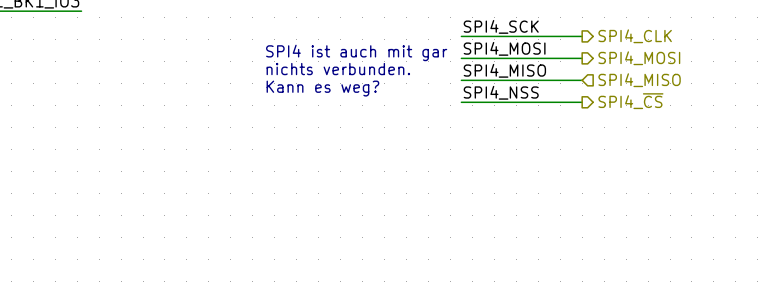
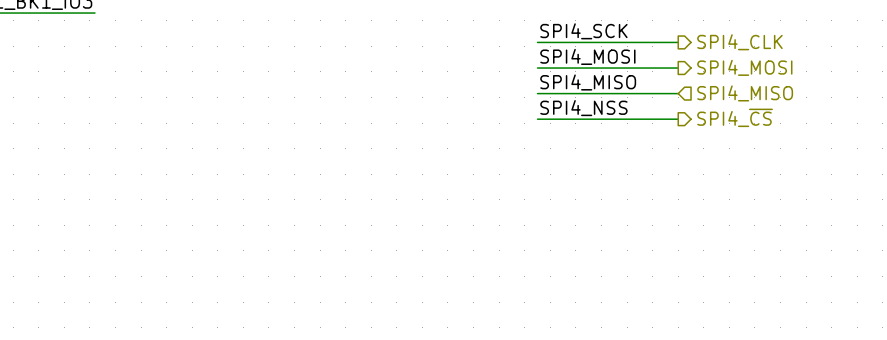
text: SPI4 ist auch mit gar (356, 52) -> none
text: nichts verbunden. (338, 69) -> none
text: Kann es weg? (322, 88) -> none

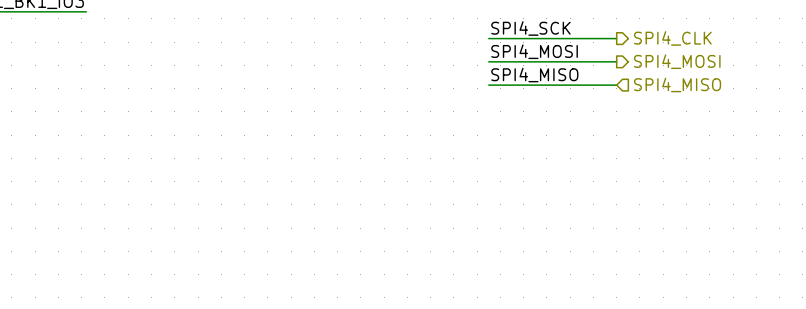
label: SPI4_NSS (583, 108) -> none
hierarchical label: SPI4_~{CS} (735, 117) -> none
wire: (537, 119) (678, 119) -> none

